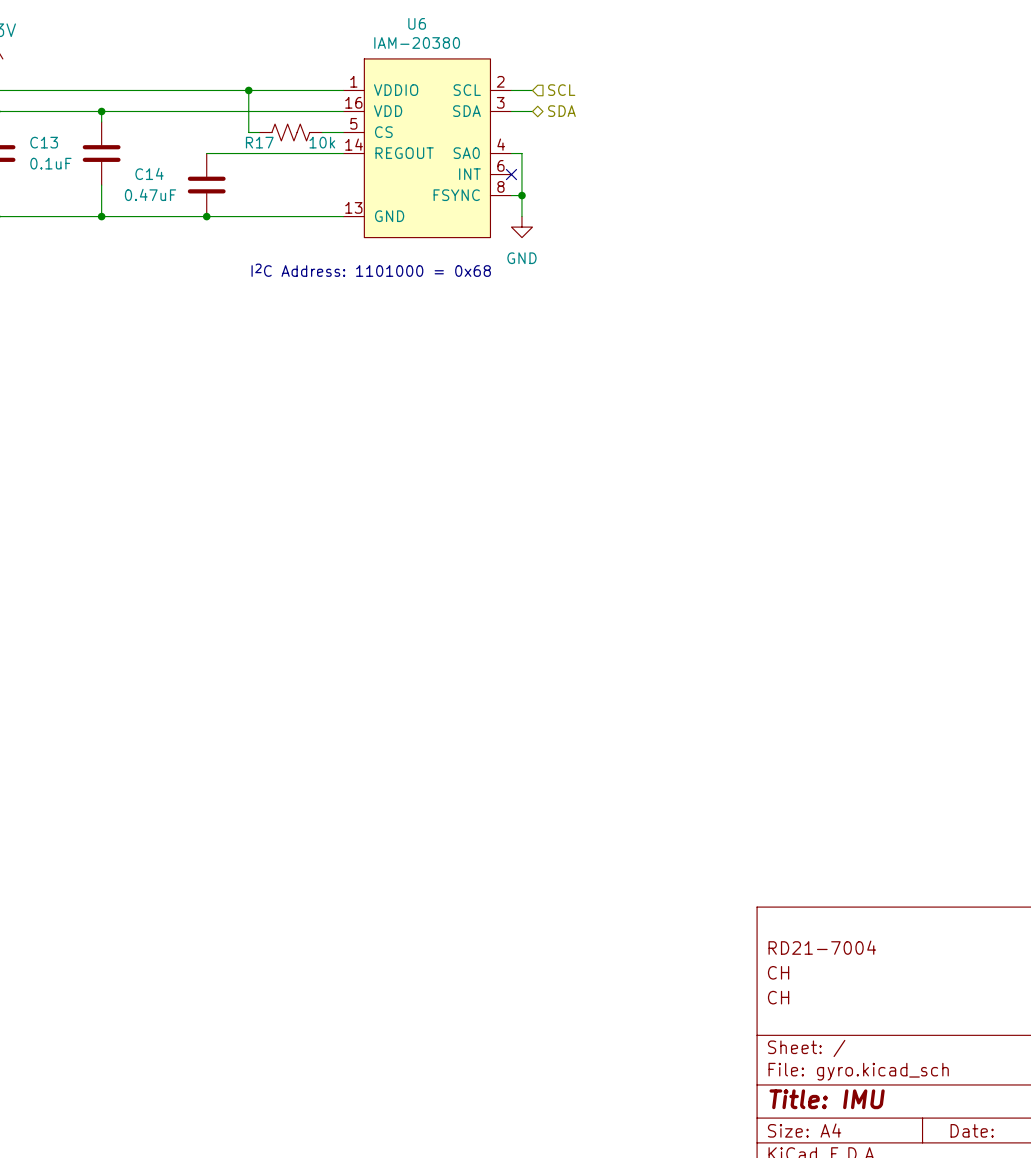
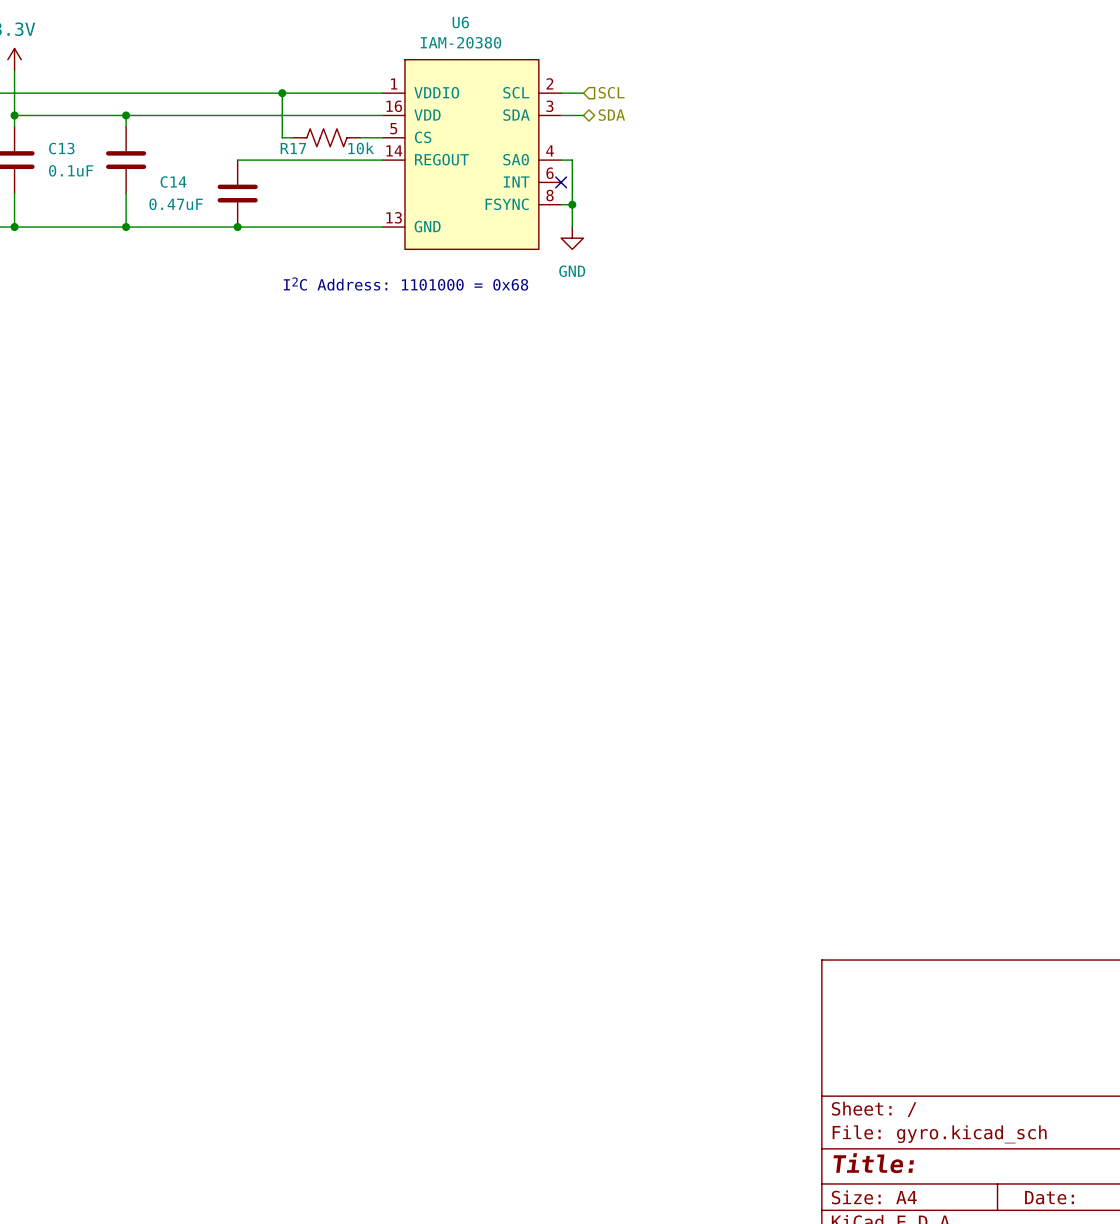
title block: RD21-7004 (822, 947) -> none
title block: CH (778, 972) -> none
title block: CH (778, 997) -> none
title block: Title: IMU (827, 1099) -> Title: (873, 1163)

